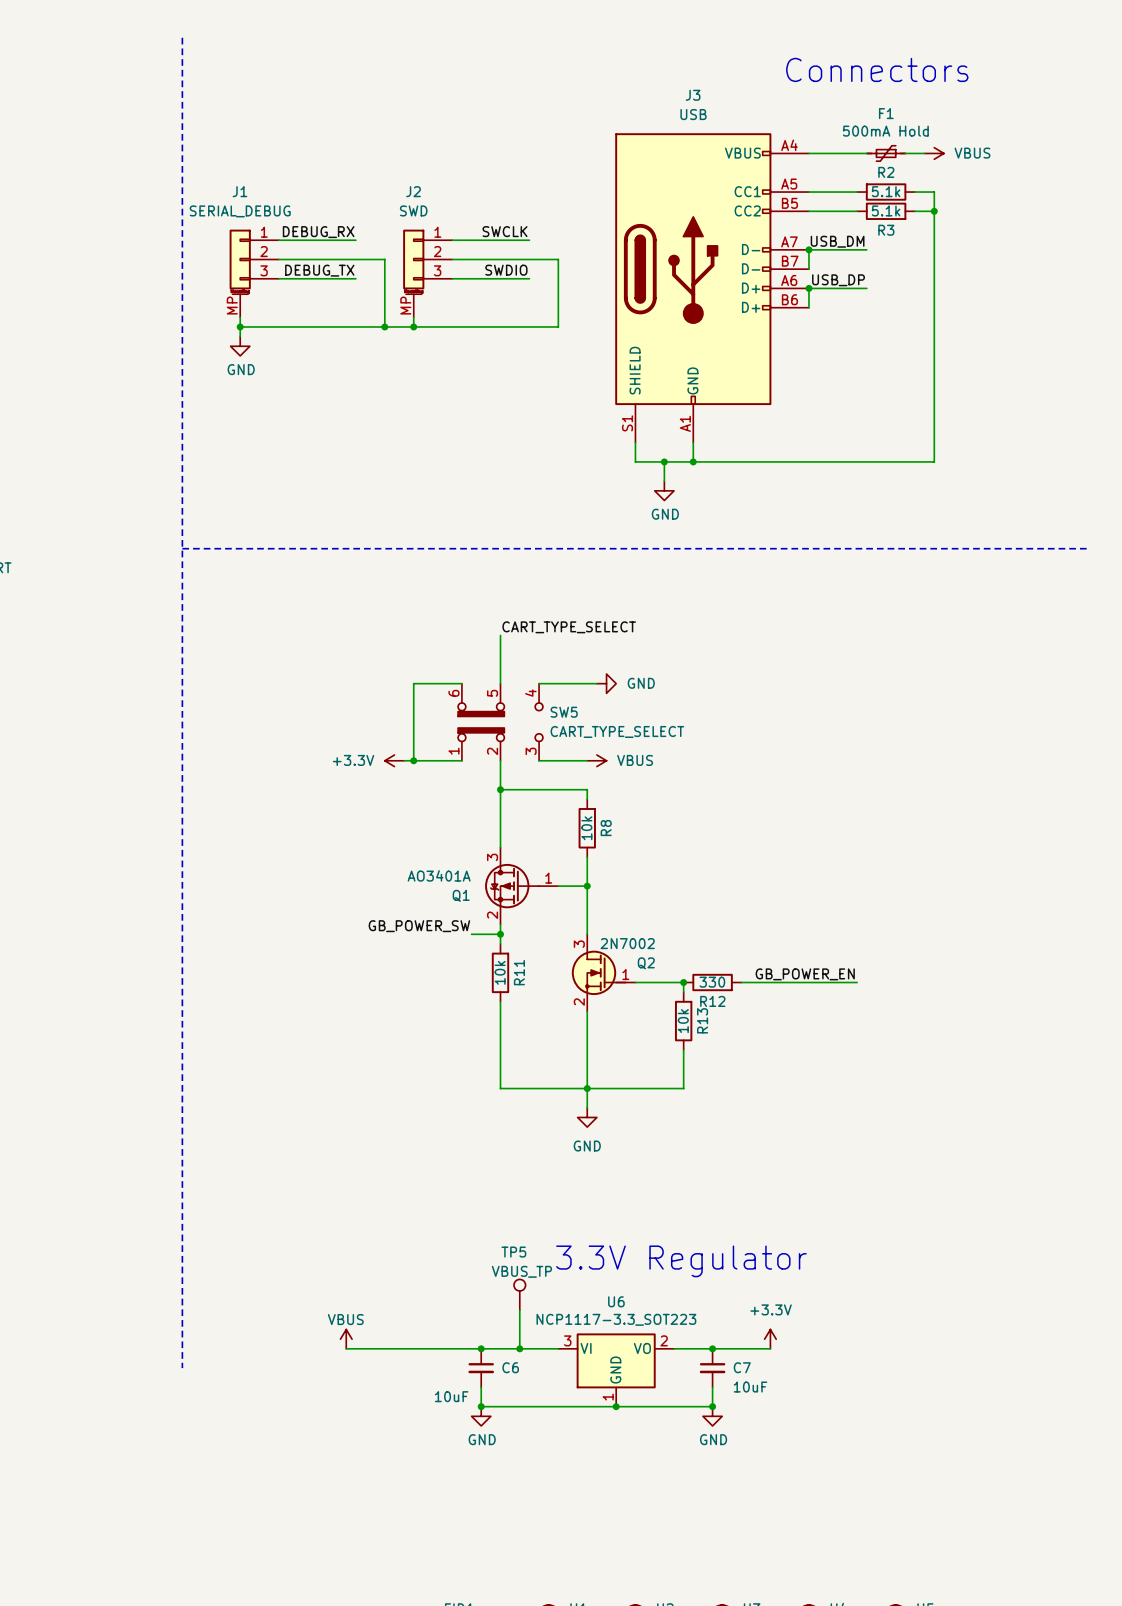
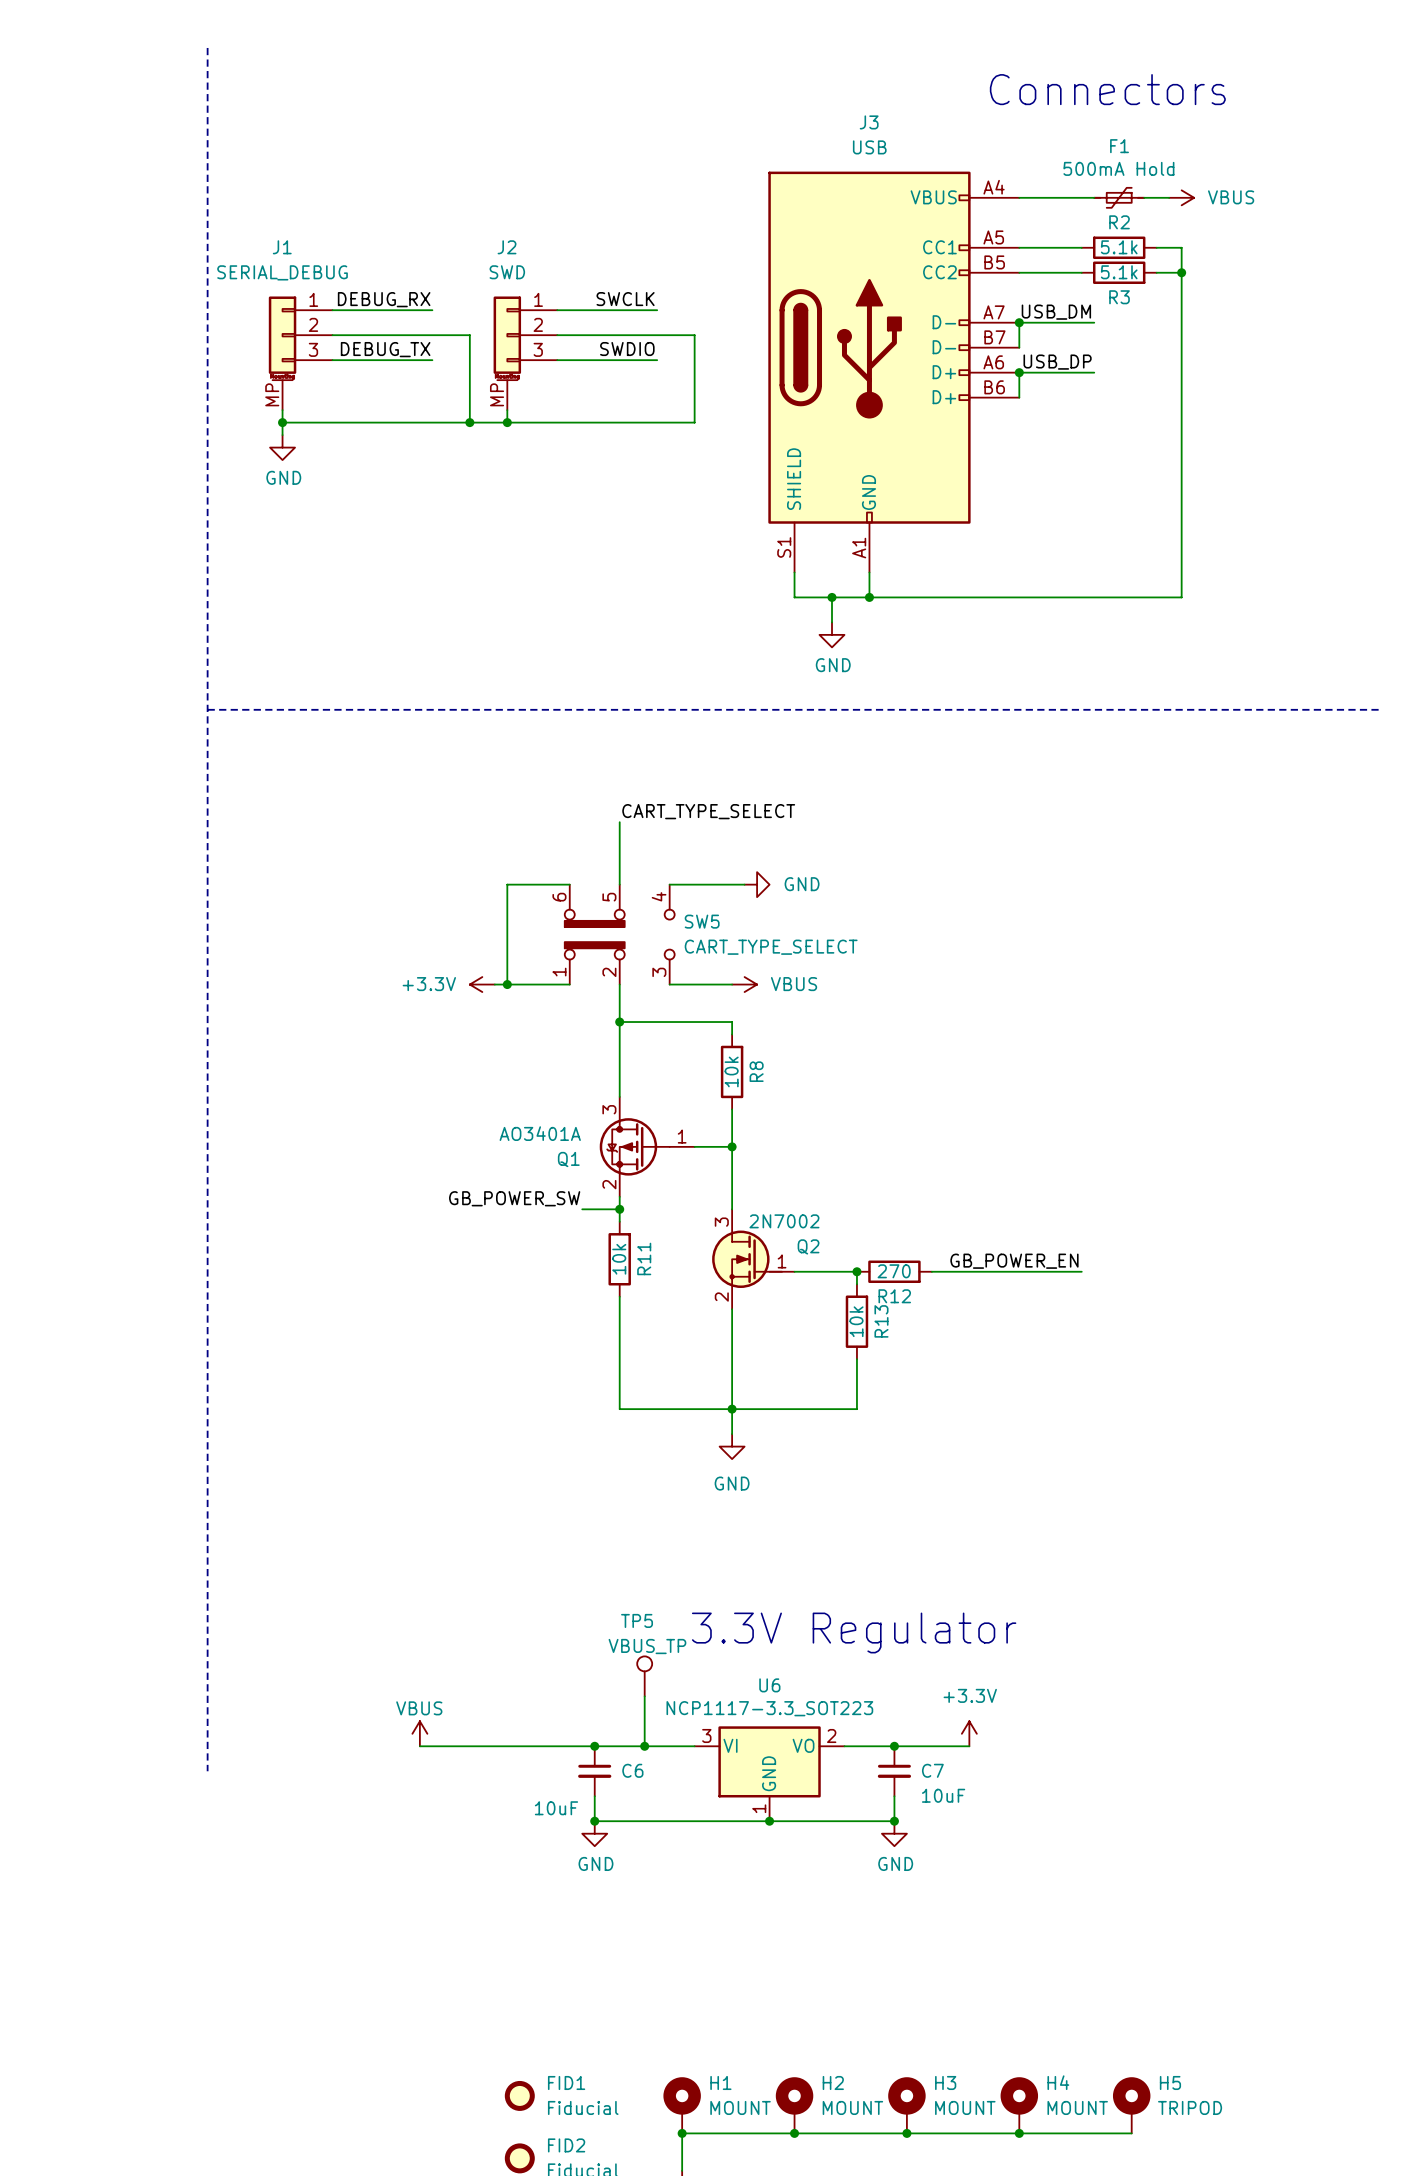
R12 value: 330 (712, 982) -> 270 (894, 1271)

